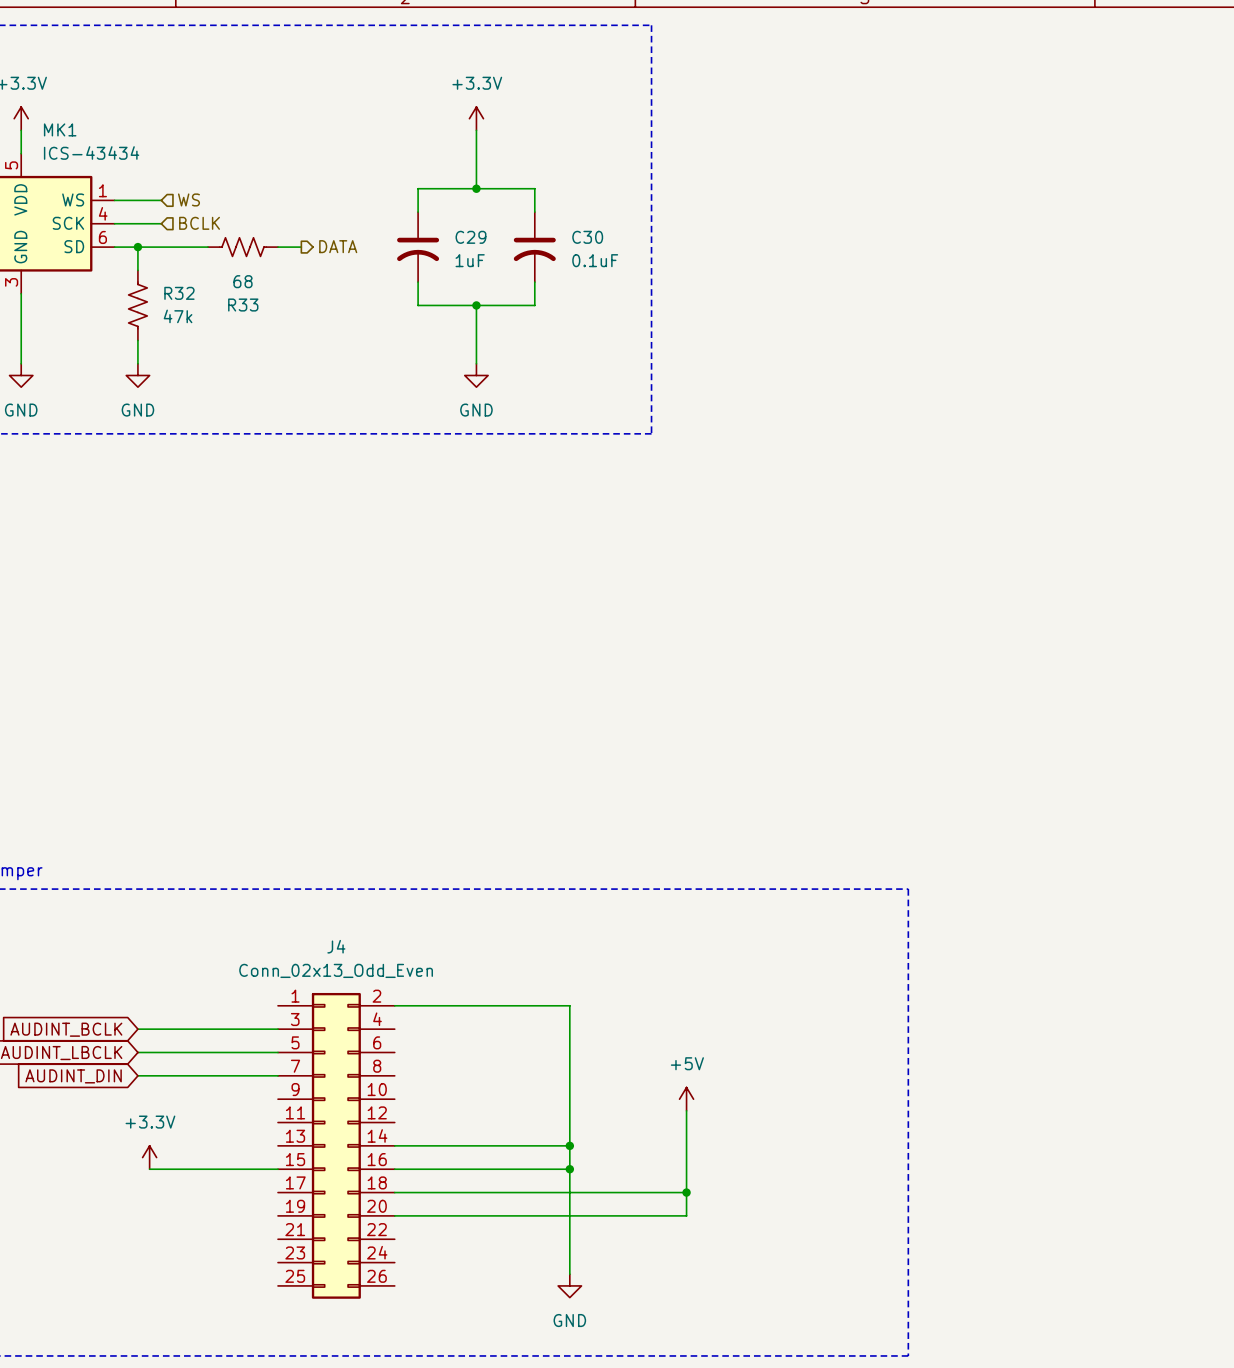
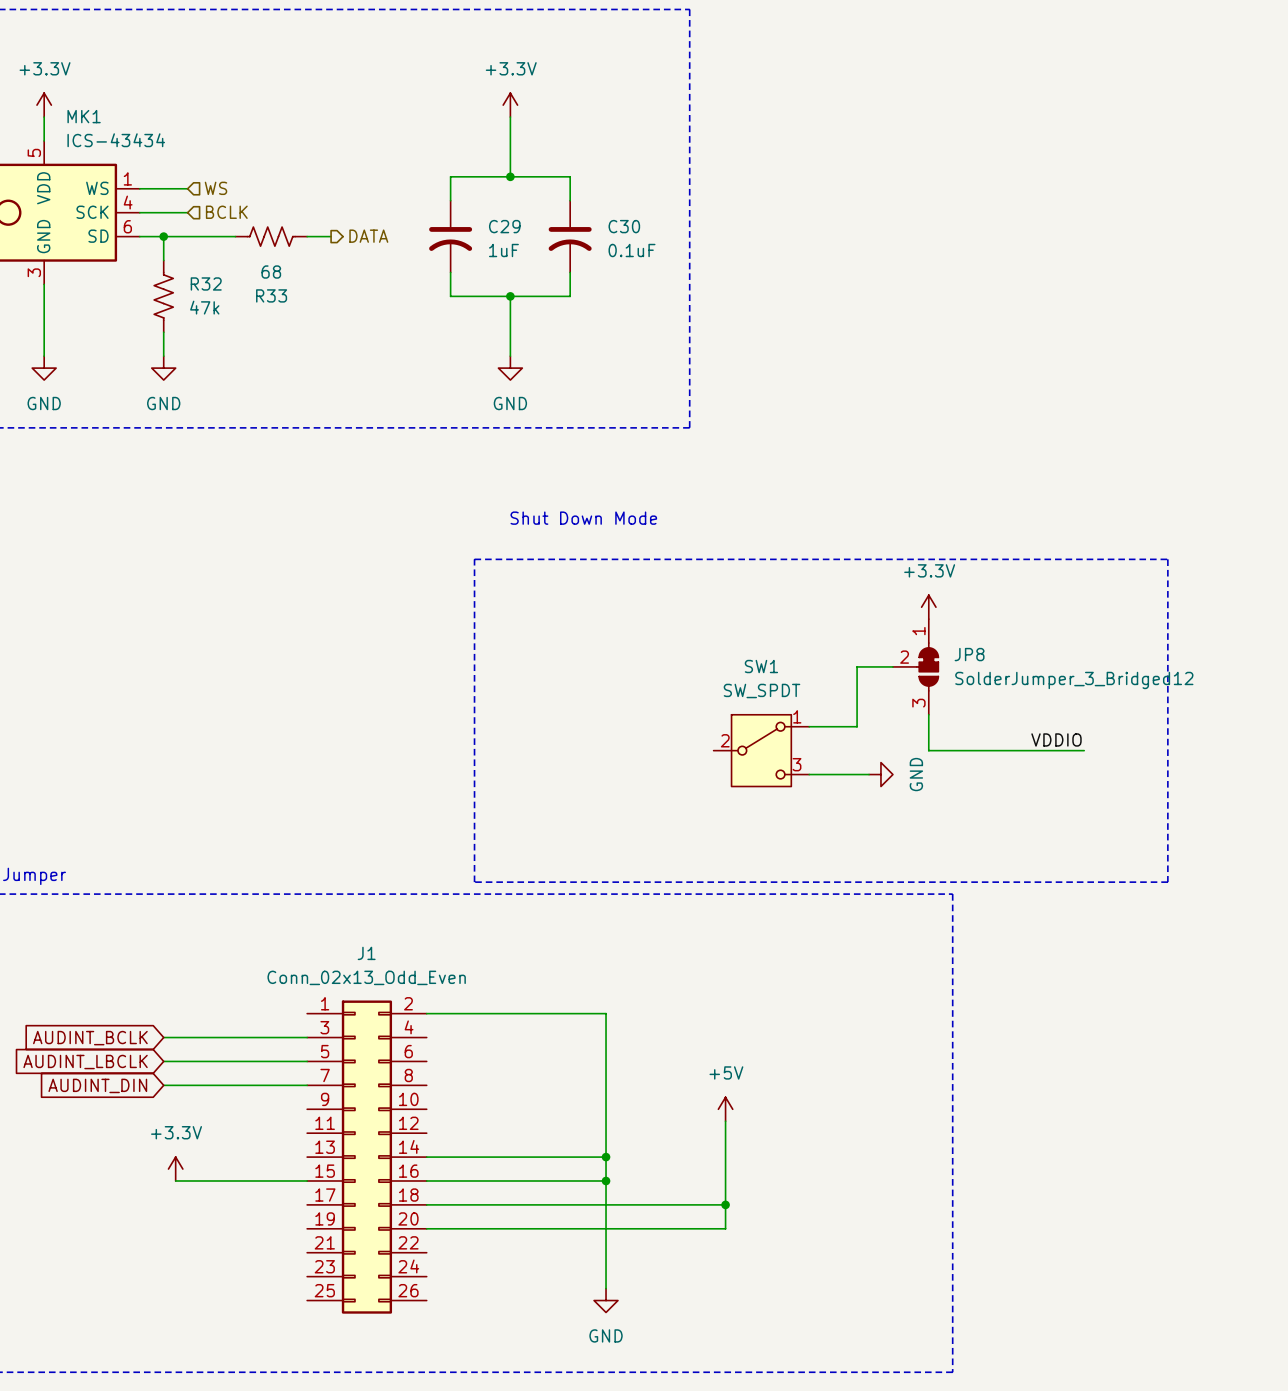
text: none -> Shut Down Mode (583, 518)
line: none -> (474, 559) (1167, 559) (1167, 882) (474, 882) (474, 559)
power symbol: none -> +3.3V (928, 607)
wire: none -> (892, 666) (857, 666) (857, 726) (809, 726)
JP8: none -> SolderJumper_3_Bridged12 (915, 666)
wire: none -> (928, 714) (928, 750) (1084, 750)
label: none -> VDDIO (1056, 739)
SW1: none -> SW_SPDT (761, 750)
wire: none -> (809, 774) (869, 774)
power symbol: none -> GND (880, 774)
J4 name: J4 (336, 946) -> J1 (366, 953)

